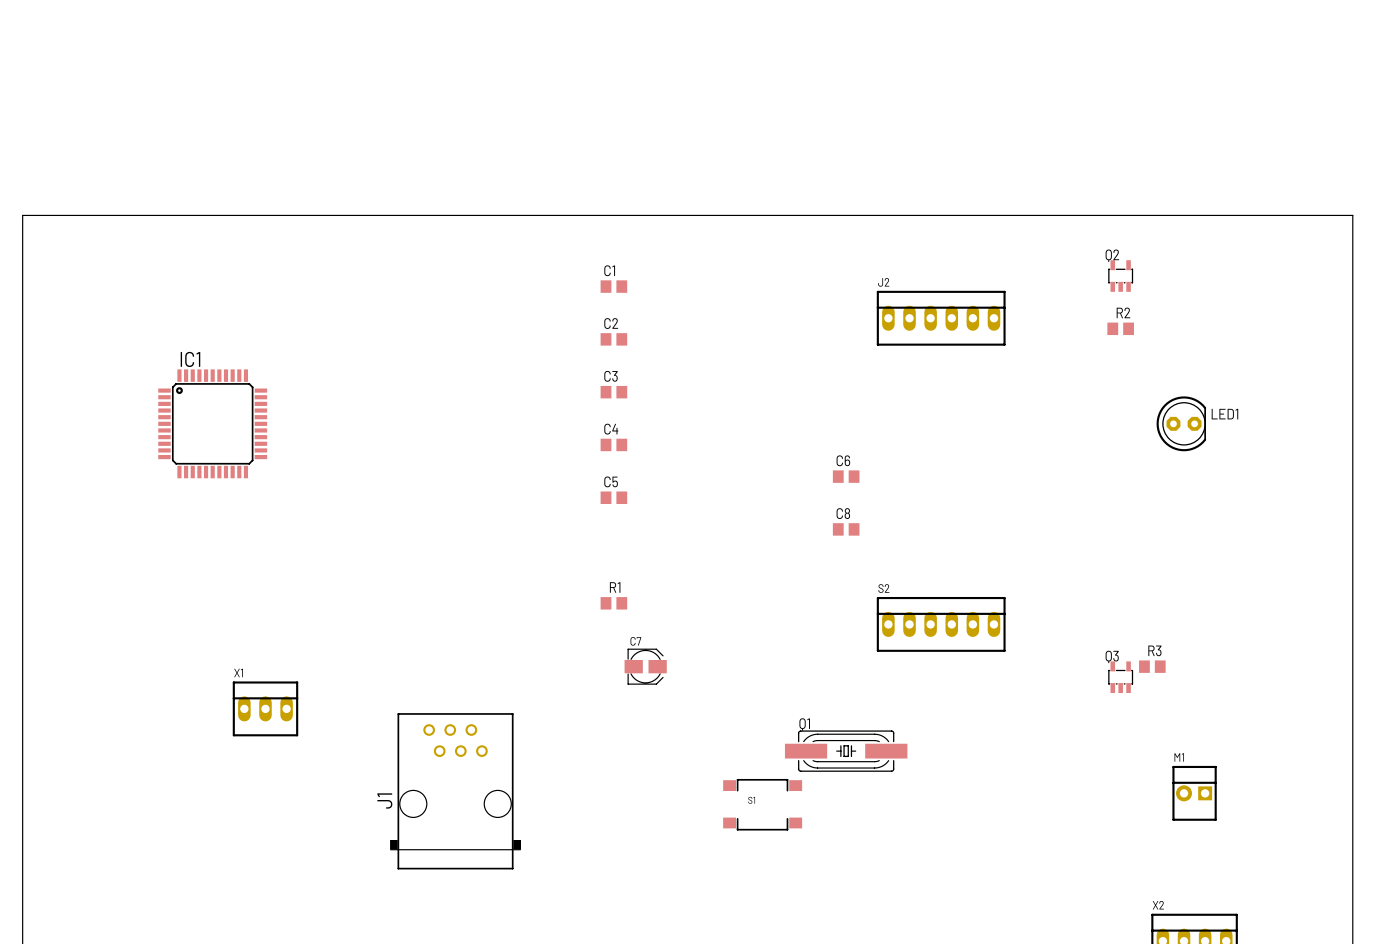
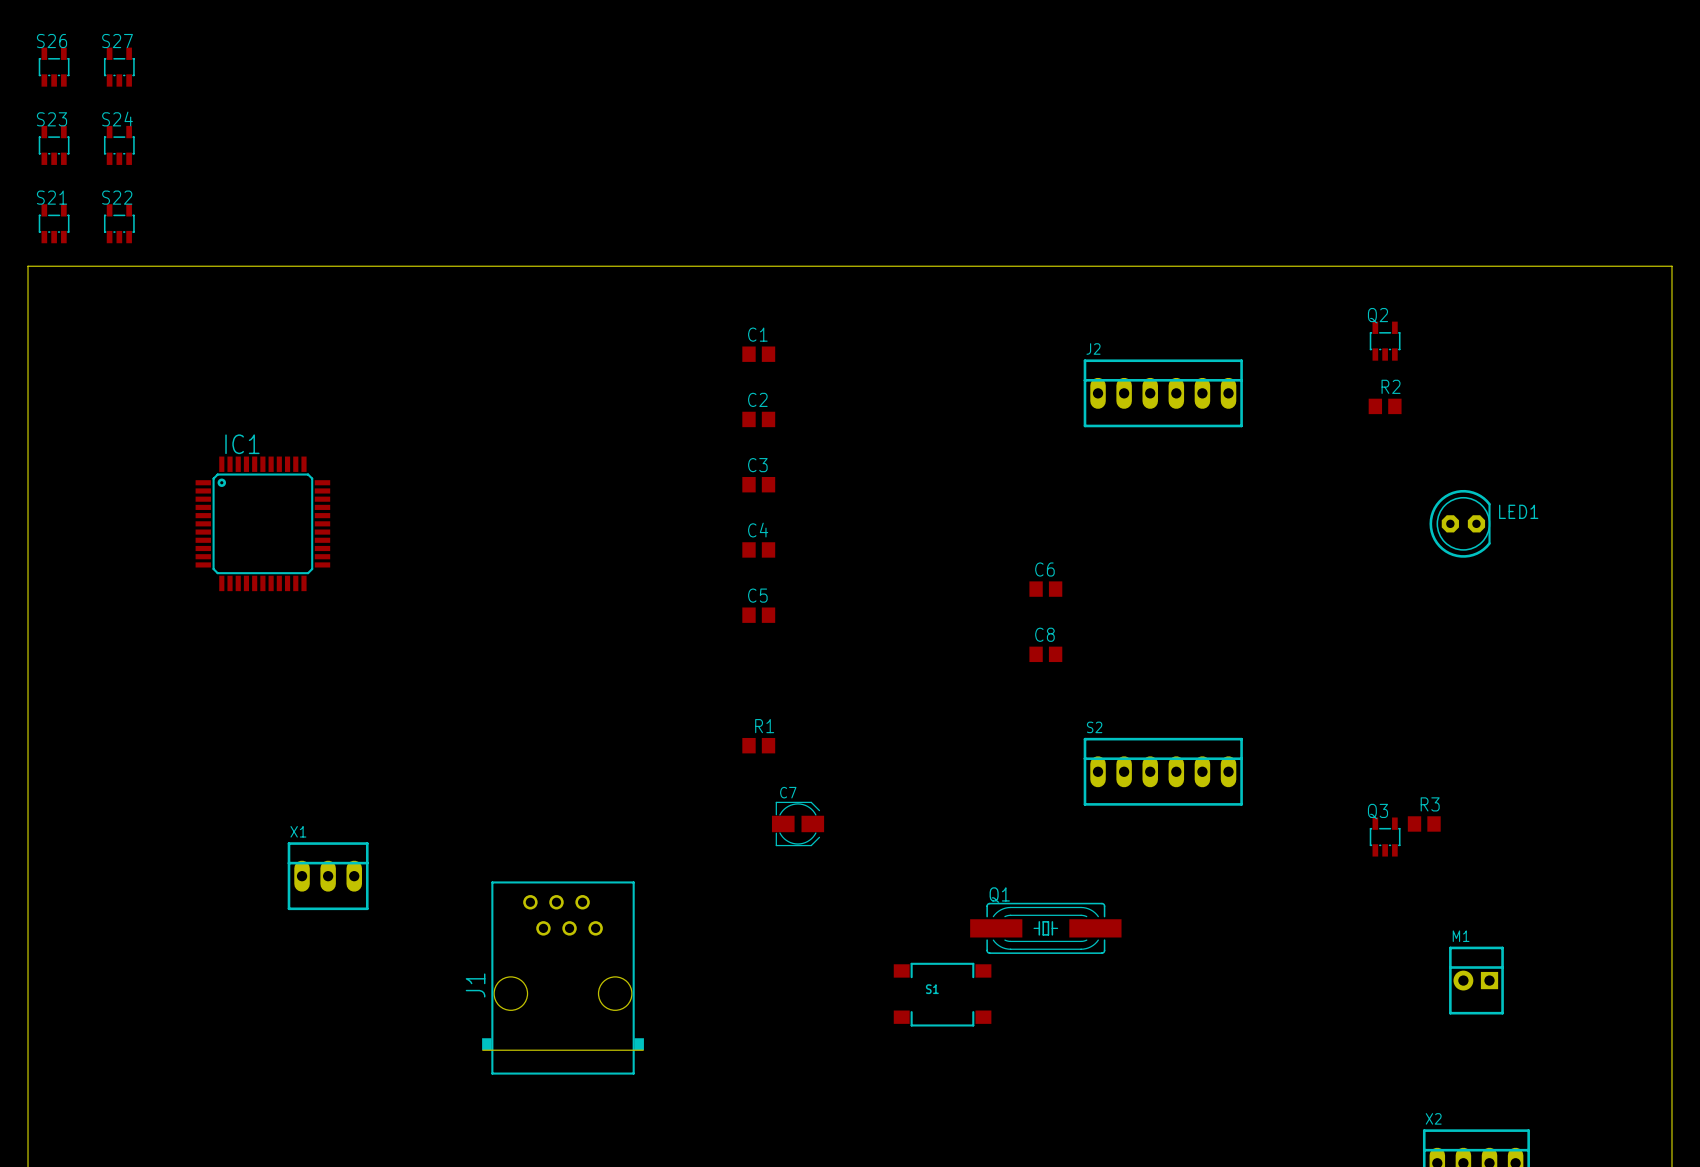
S26: none -> (54, 67)
S27: none -> (119, 67)
S23: none -> (54, 145)
S24: none -> (119, 145)
S21: none -> (54, 223)
S22: none -> (119, 223)

